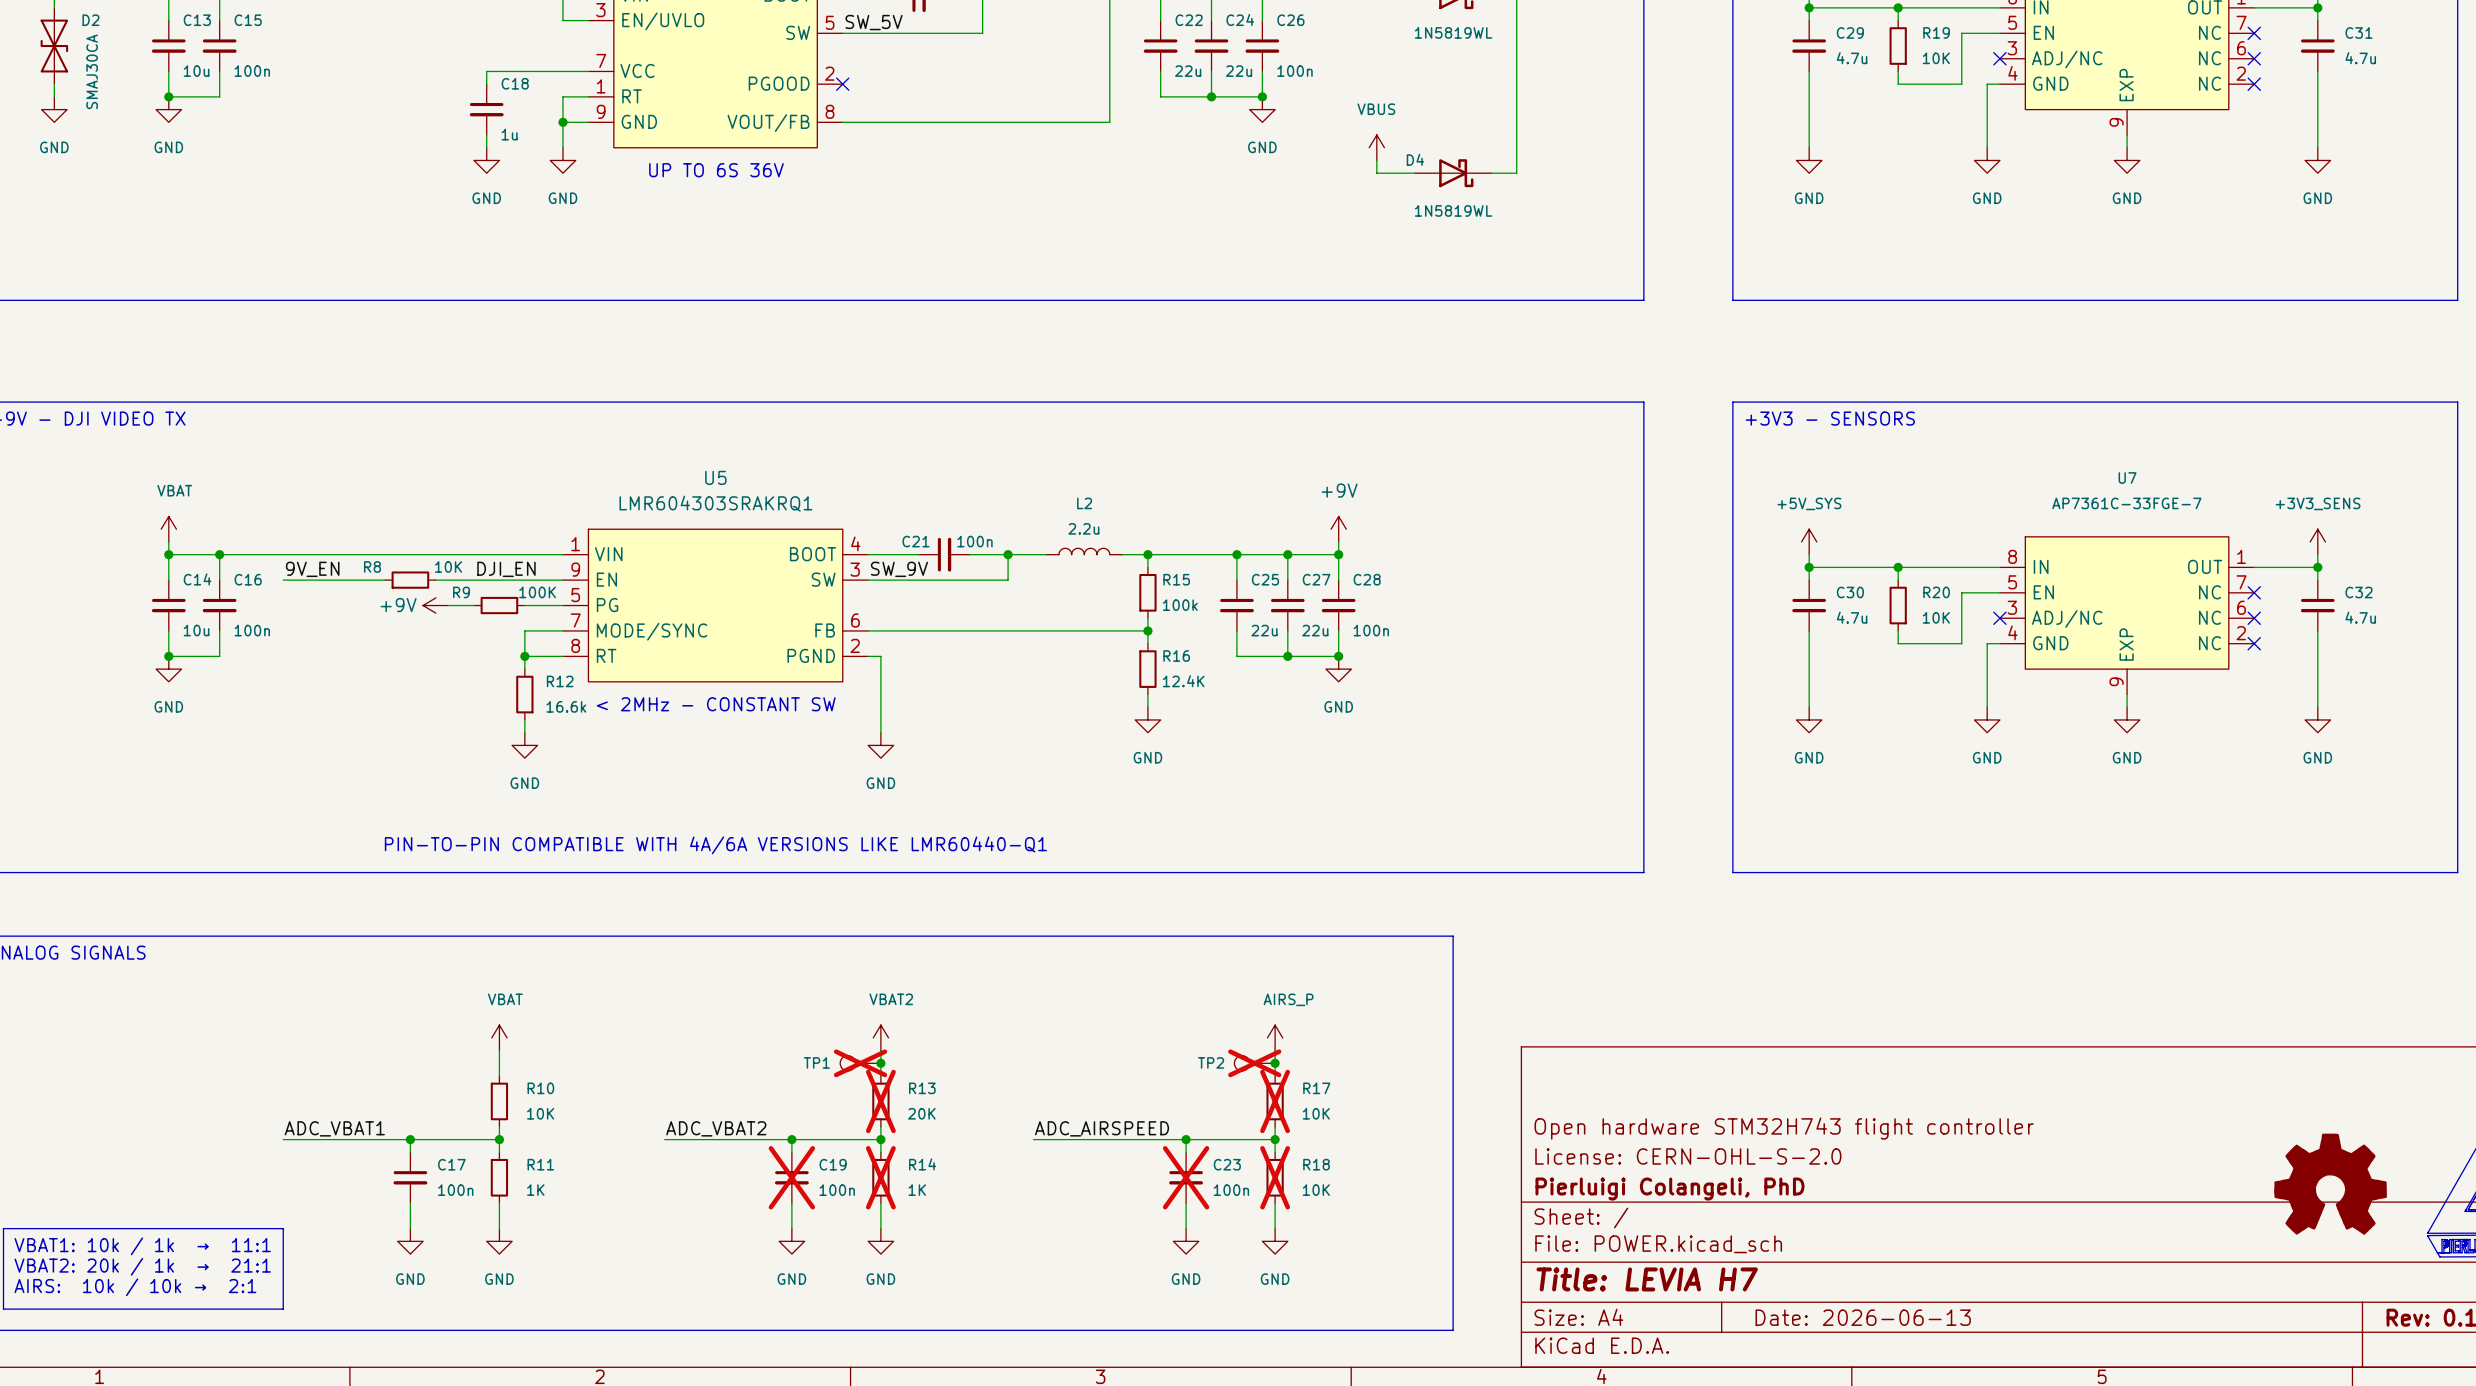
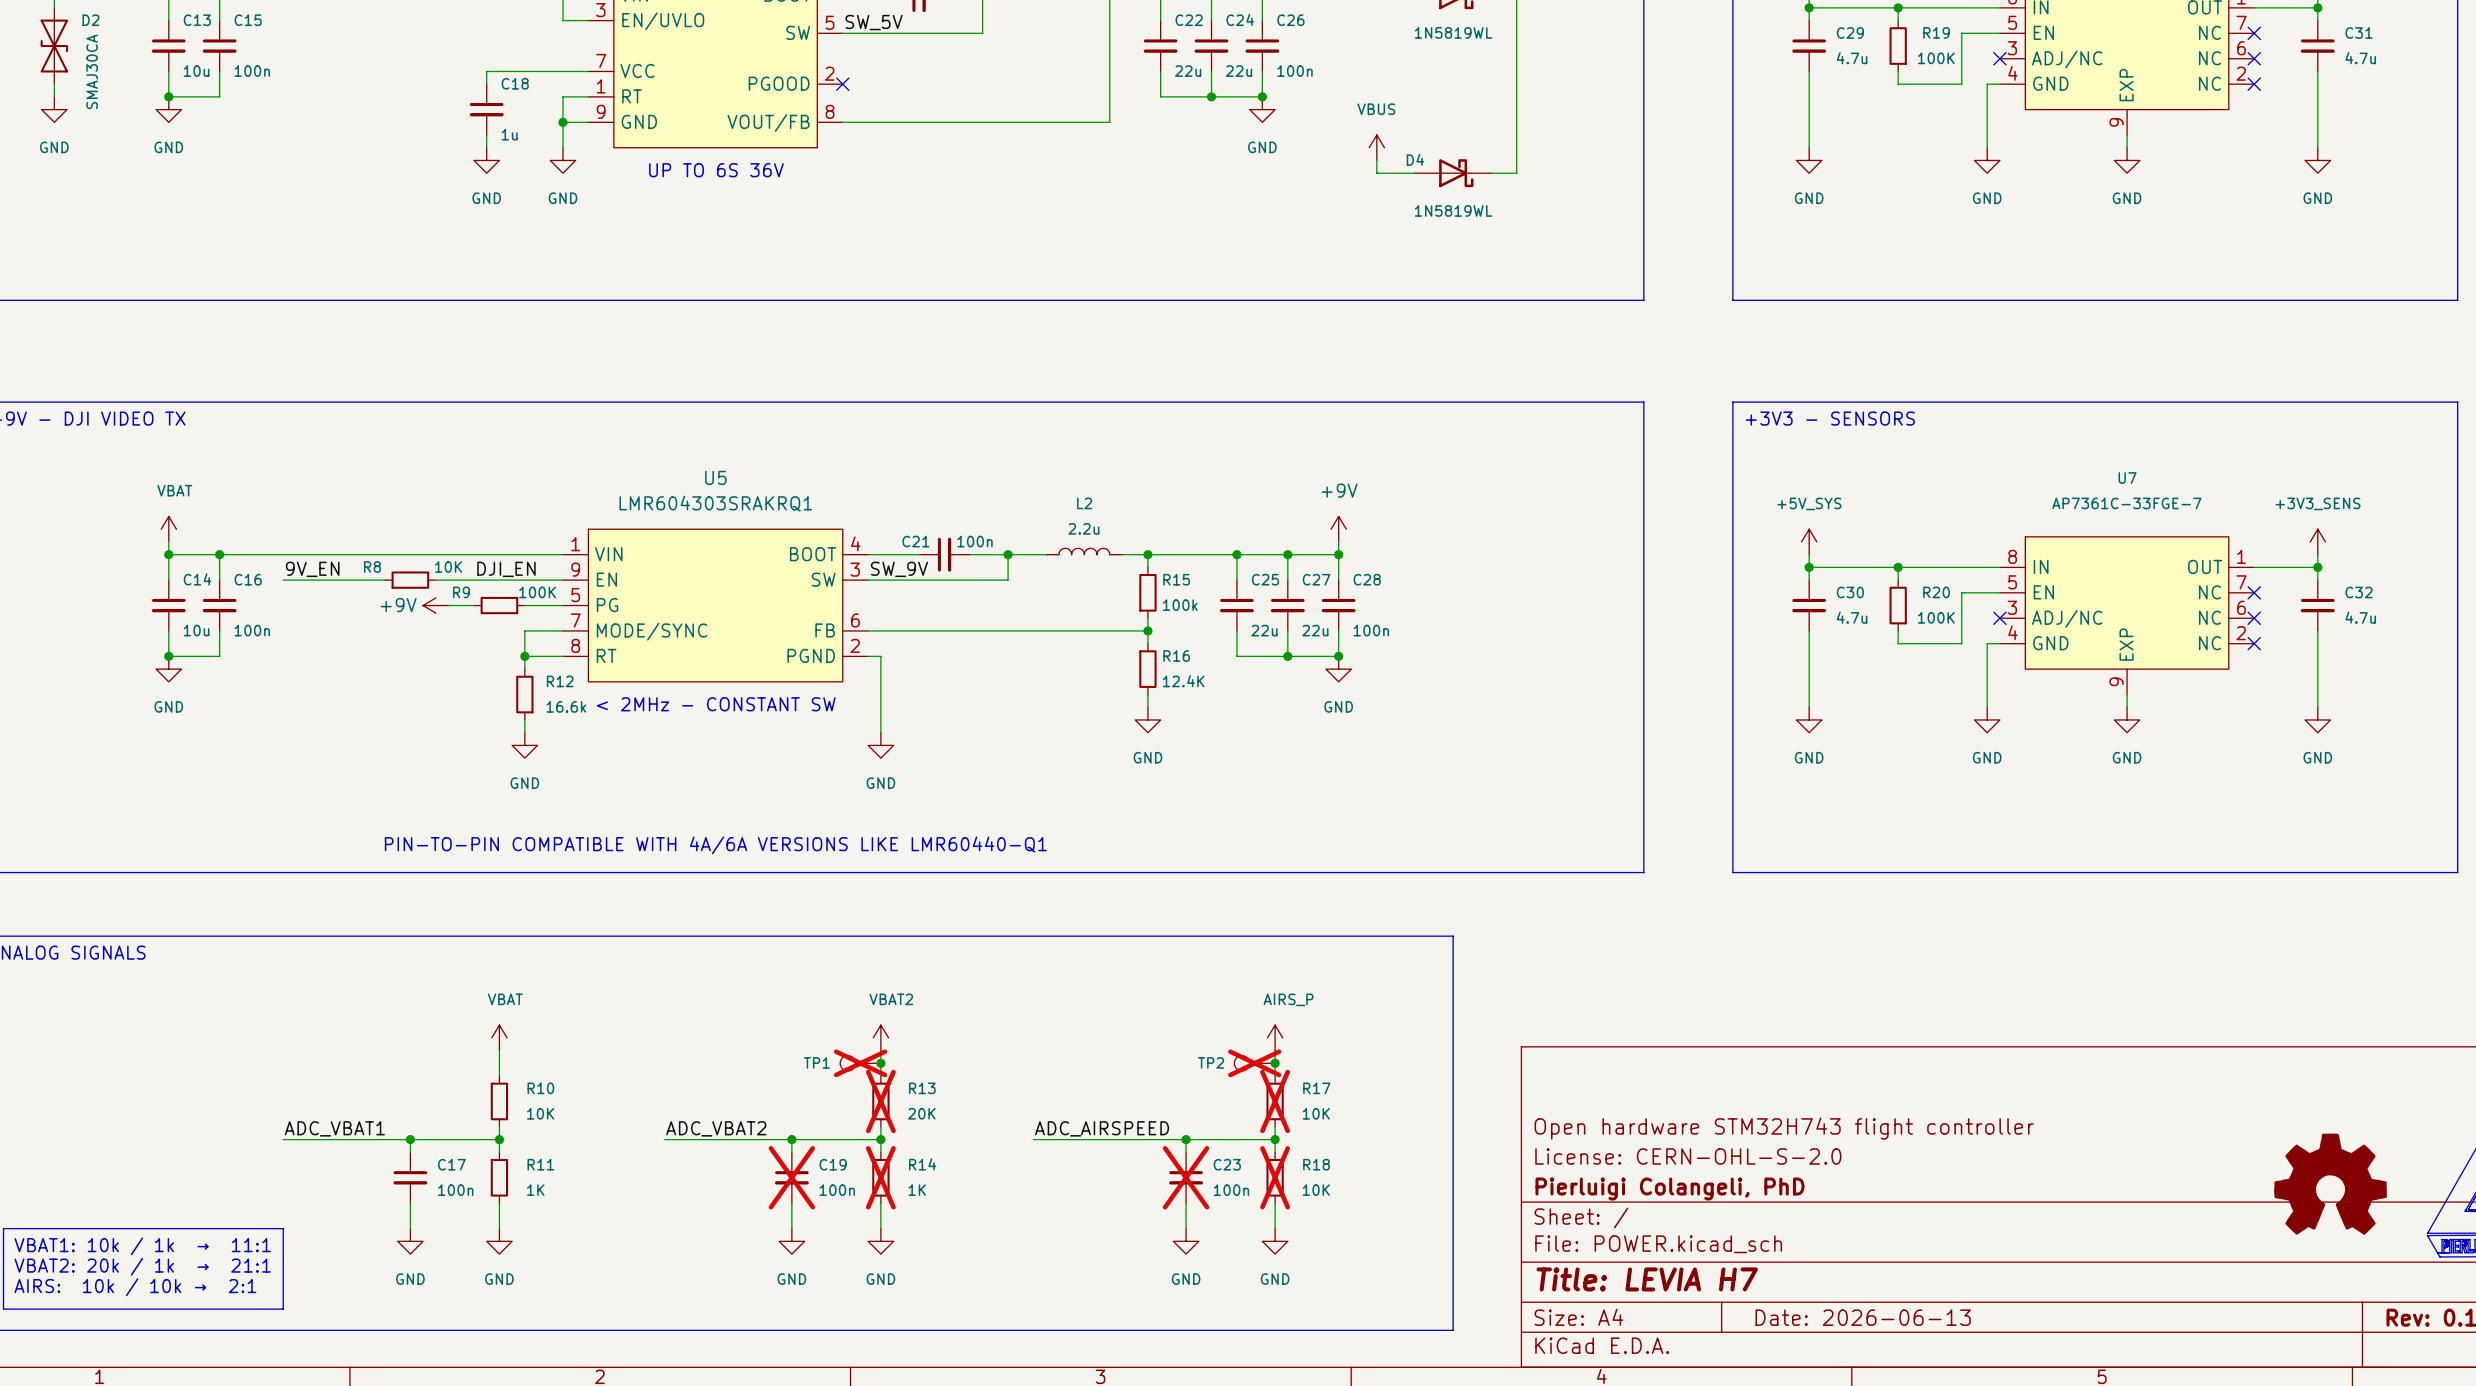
R19 value: 10K (1936, 58) -> 100K (1936, 58)
R20 value: 10K (1936, 617) -> 100K (1936, 617)

